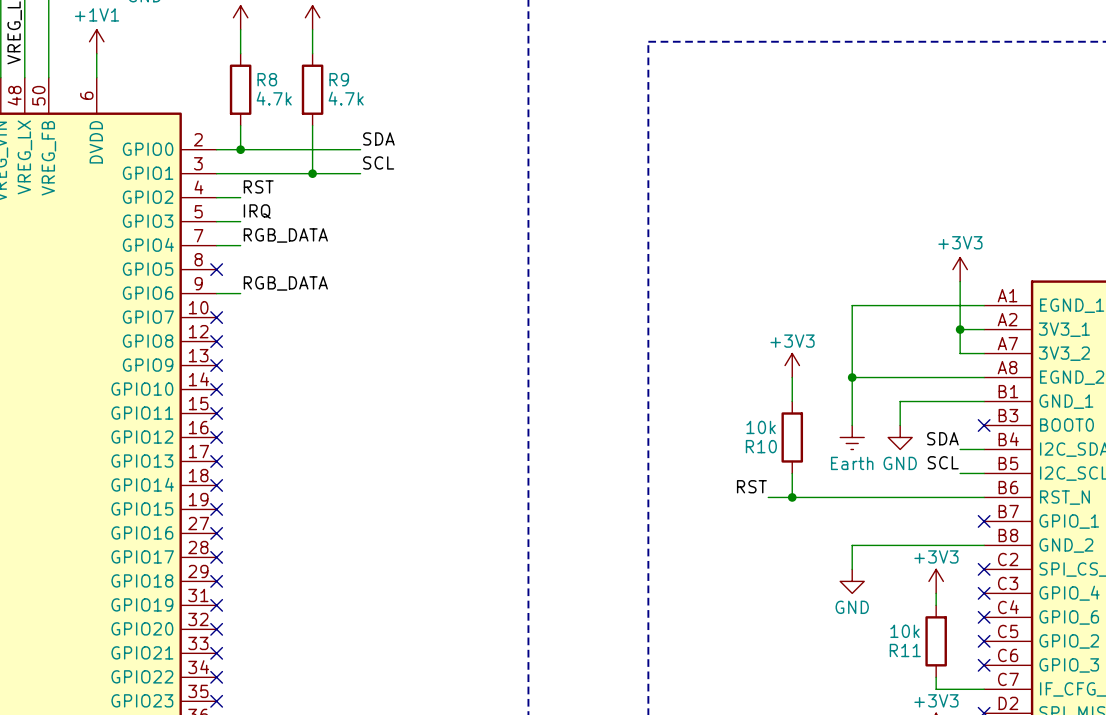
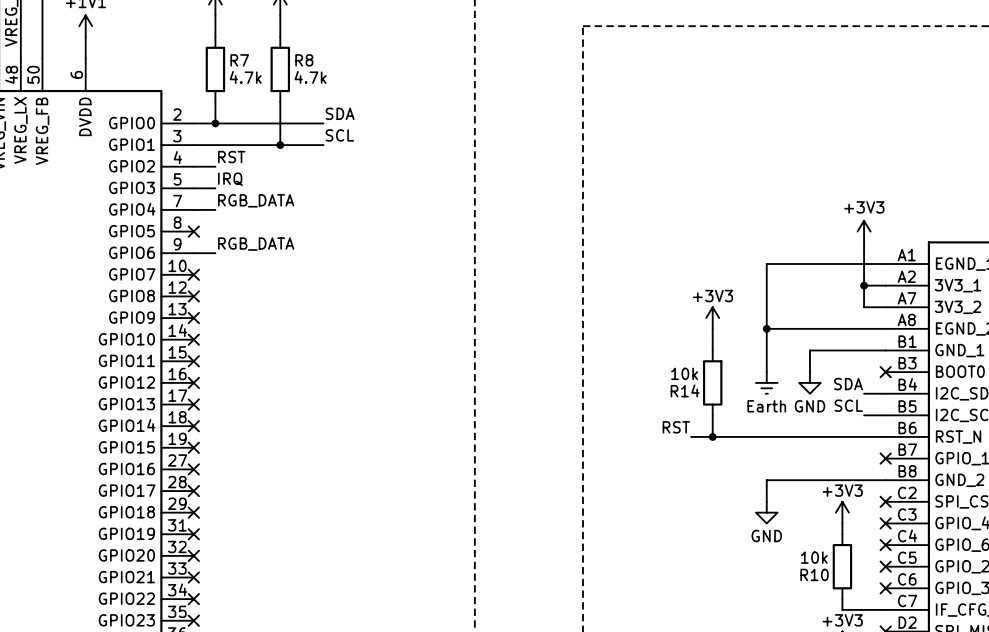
R8 name: R8 (267, 79) -> R7 (239, 60)
R9 name: R9 (339, 79) -> R8 (304, 60)
R10 name: R10 (761, 446) -> R14 (685, 390)
R11 name: R11 (905, 650) -> R10 (814, 574)

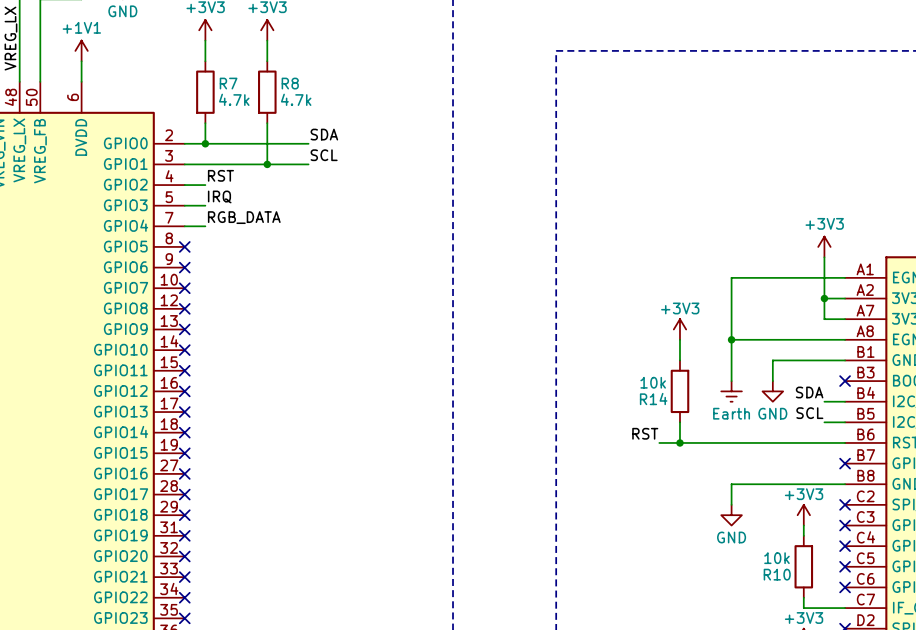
label: RGB_DATA (256, 244) -> none
wire: (193, 253) (215, 253) -> none
no-connect mark: none -> (184, 267)

